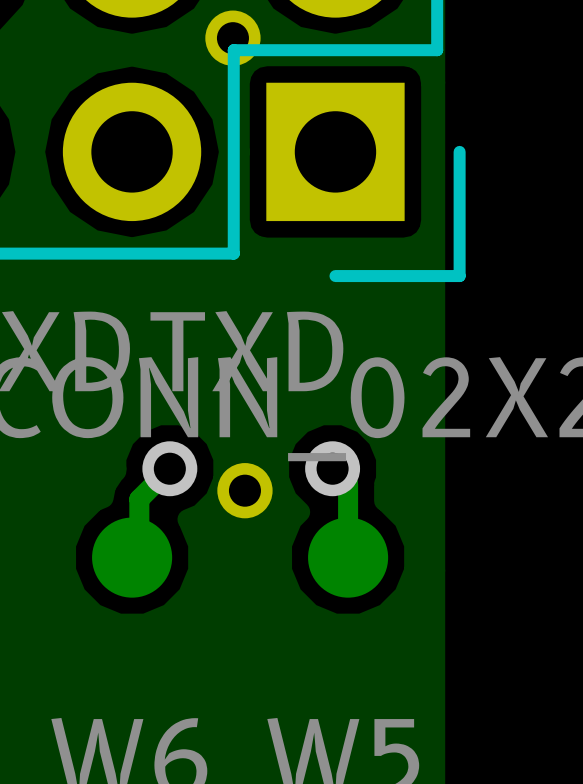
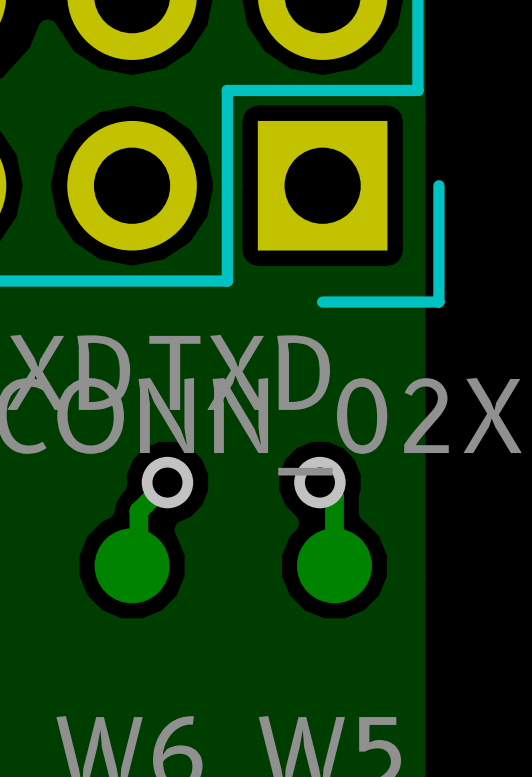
part: (232, 38) -> none
part: (244, 490) -> none

